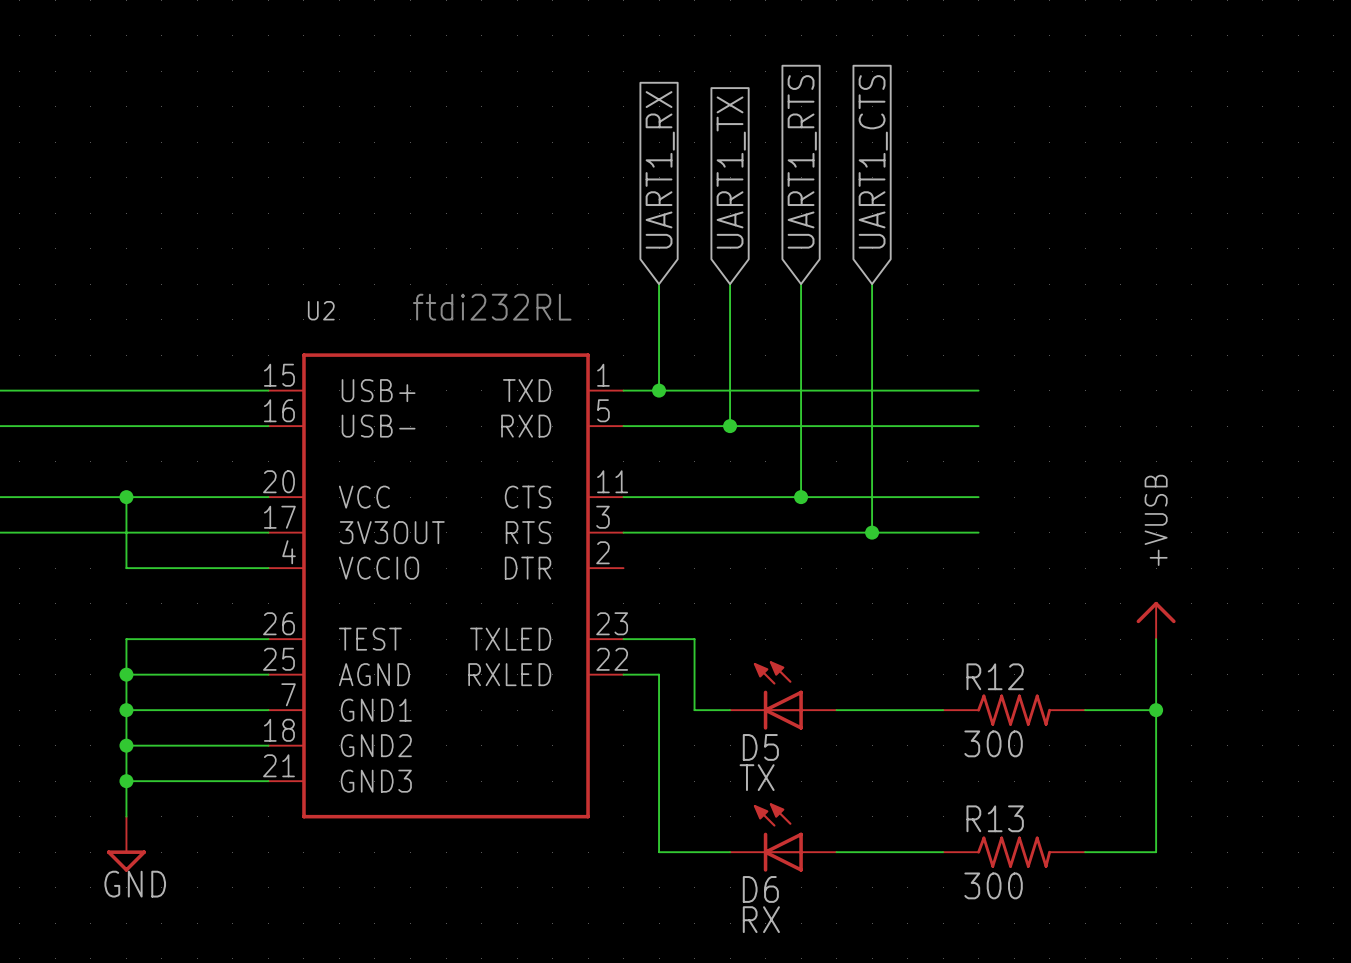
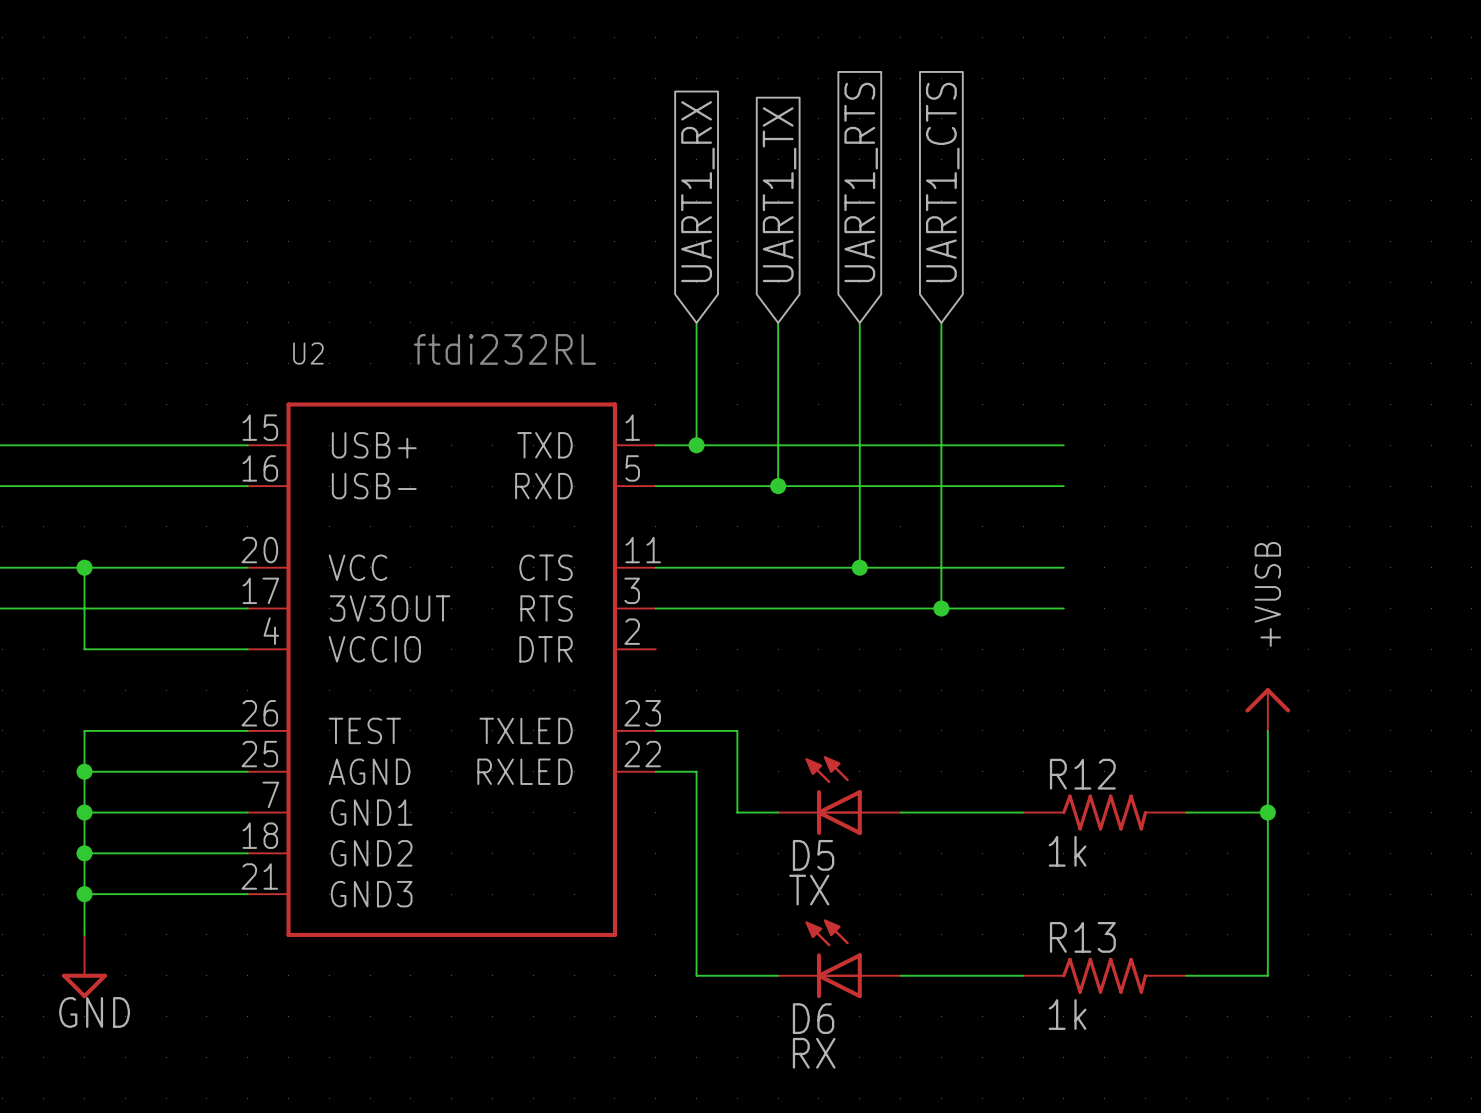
R12 value: 300 (993, 743) -> 1k (1067, 851)
R13 value: 300 (993, 885) -> 1k (1067, 1014)

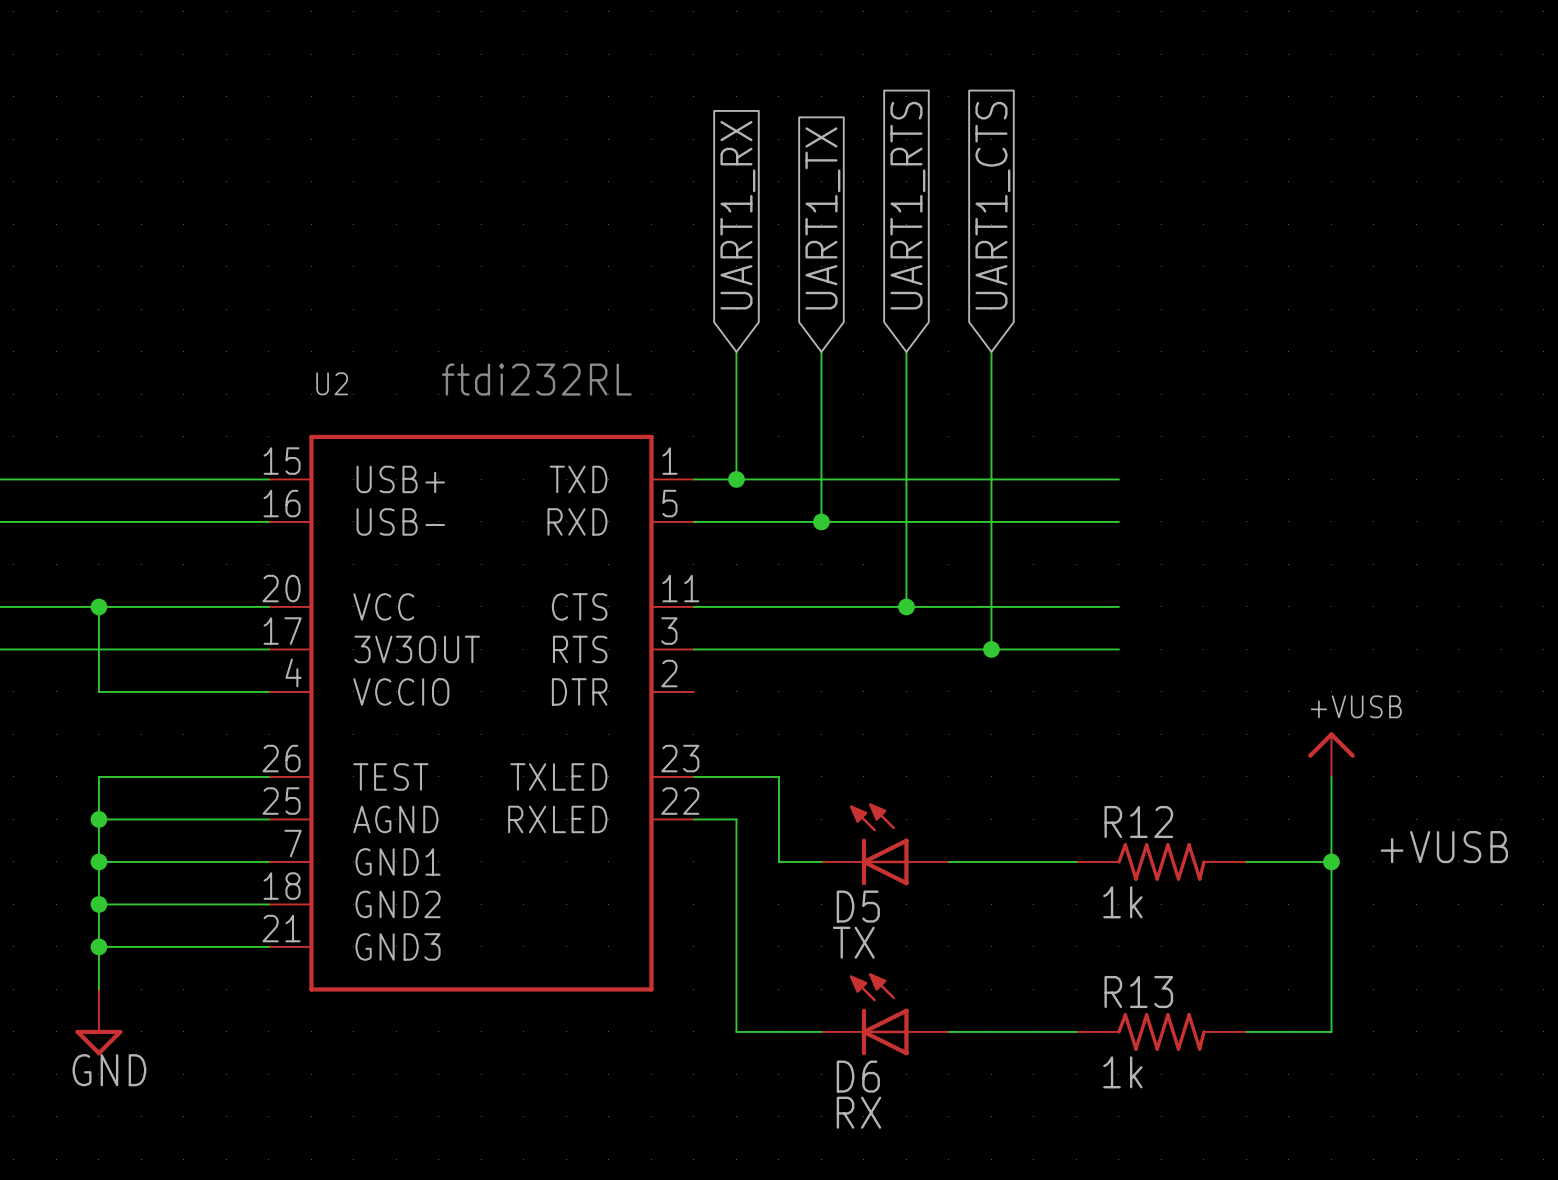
power symbol pin name: +VUSB (1267, 594) -> none
power symbol text: none -> +VUSB (1356, 706)
label: none -> +VUSB (1444, 847)

